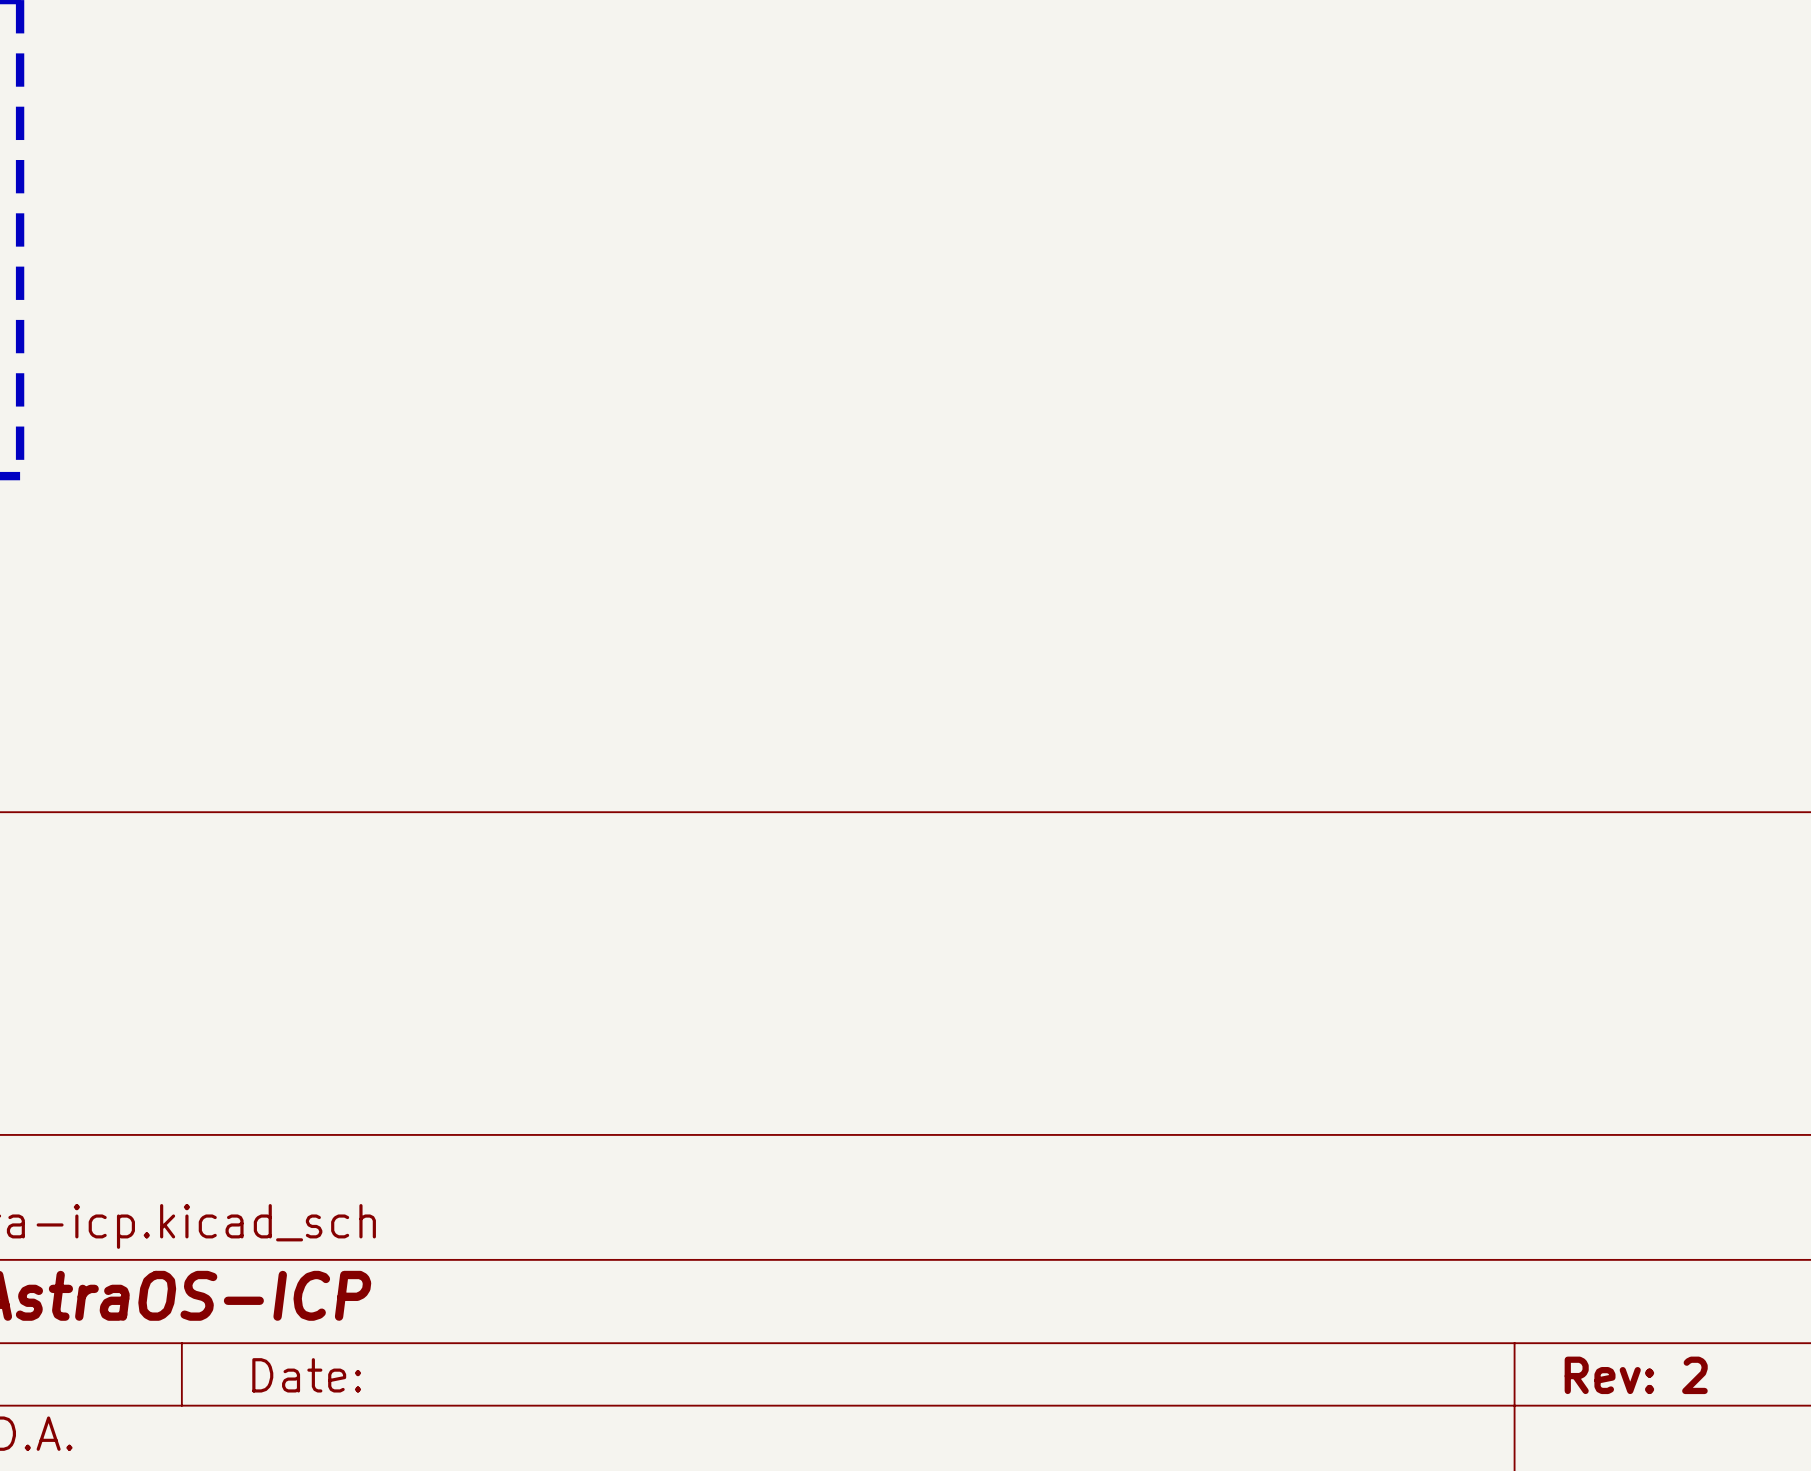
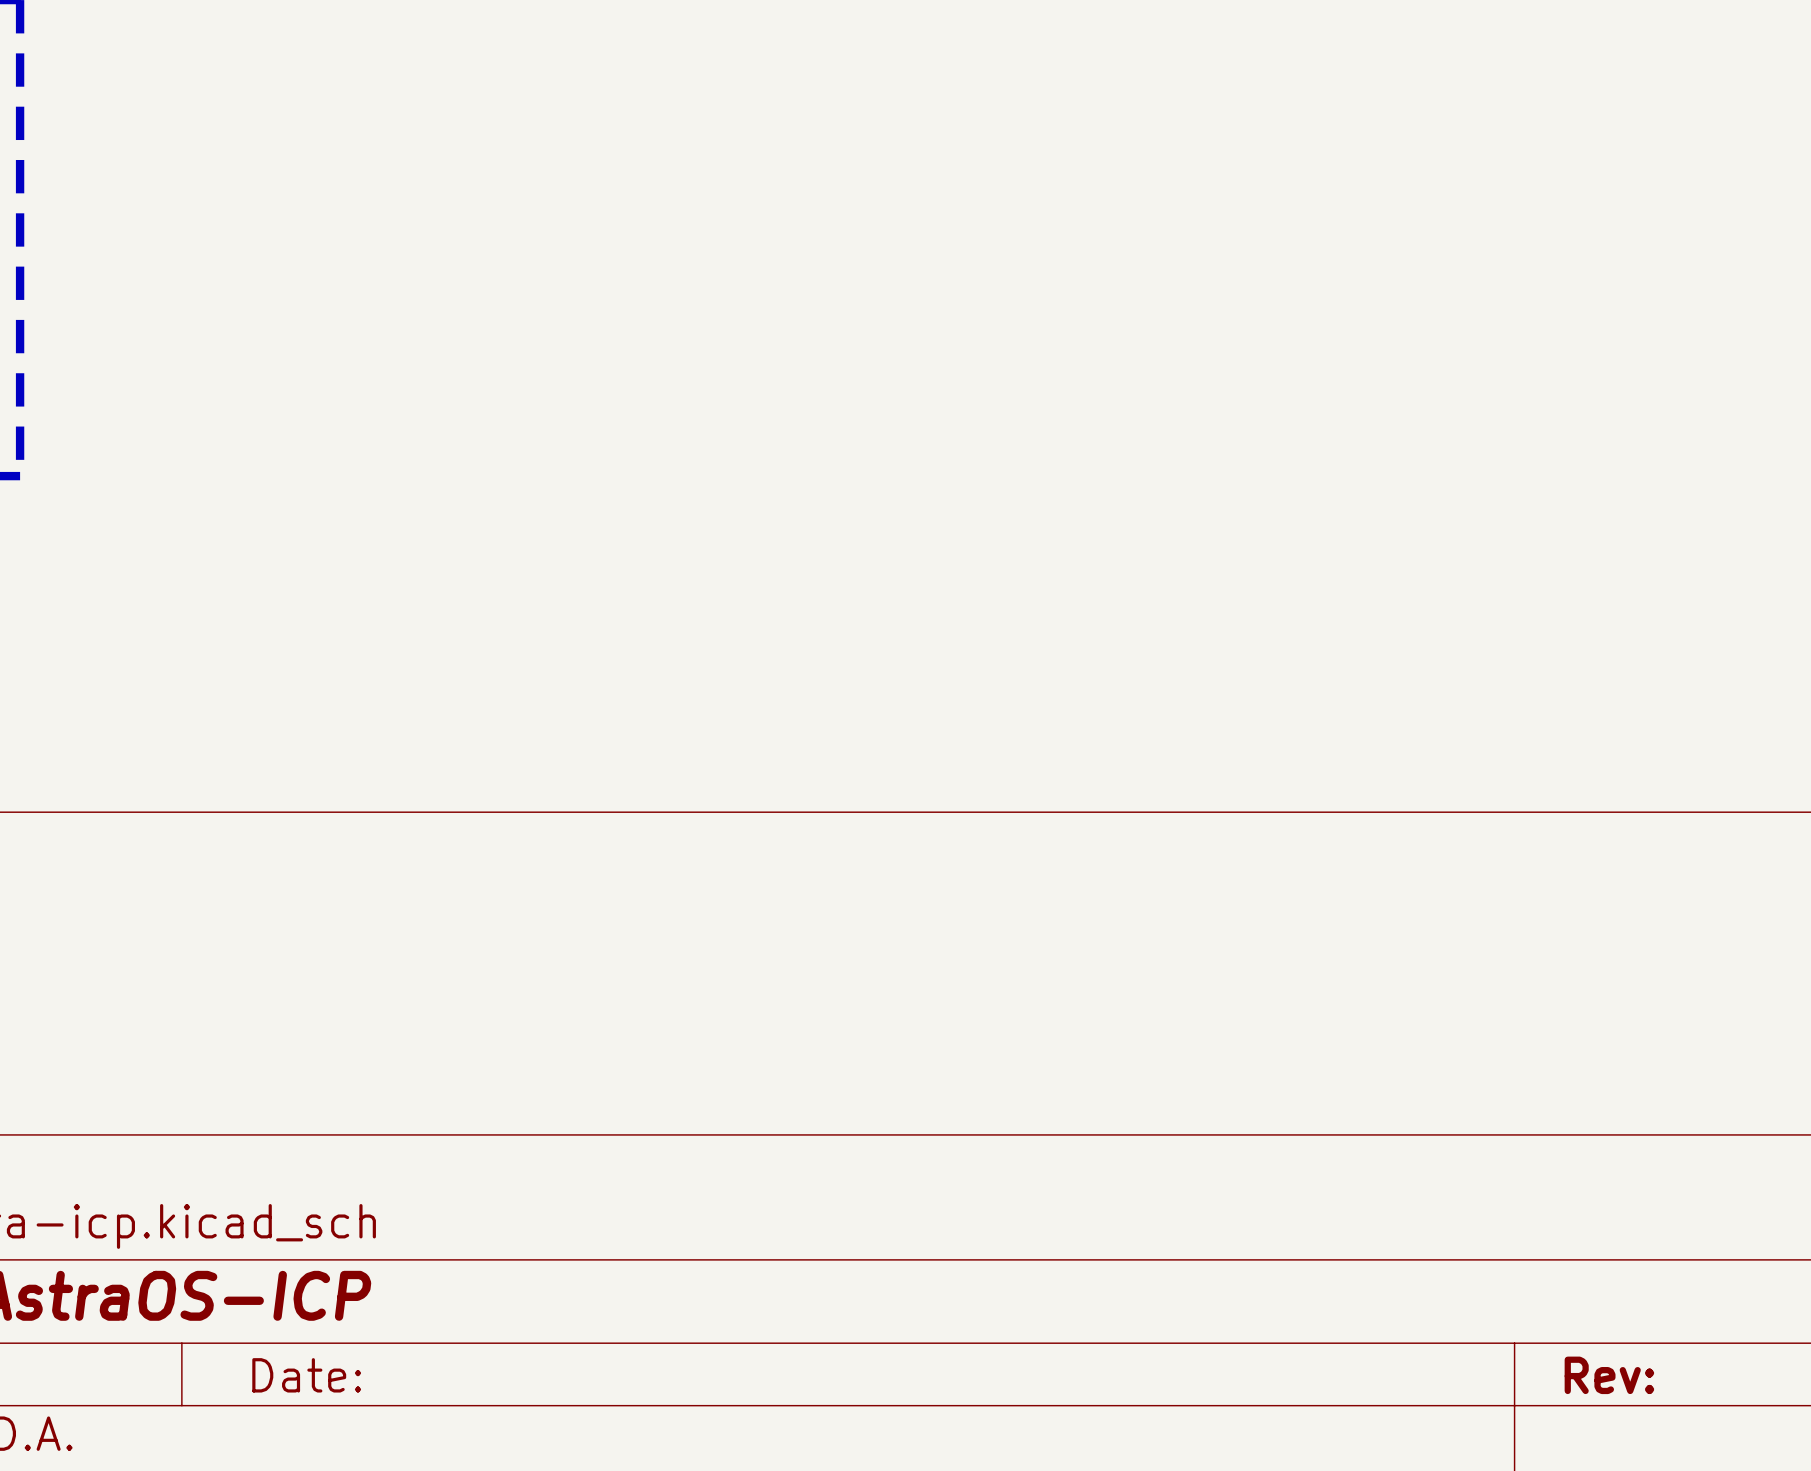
title block: Rev: 2 (1636, 1375) -> Rev: (1609, 1375)

